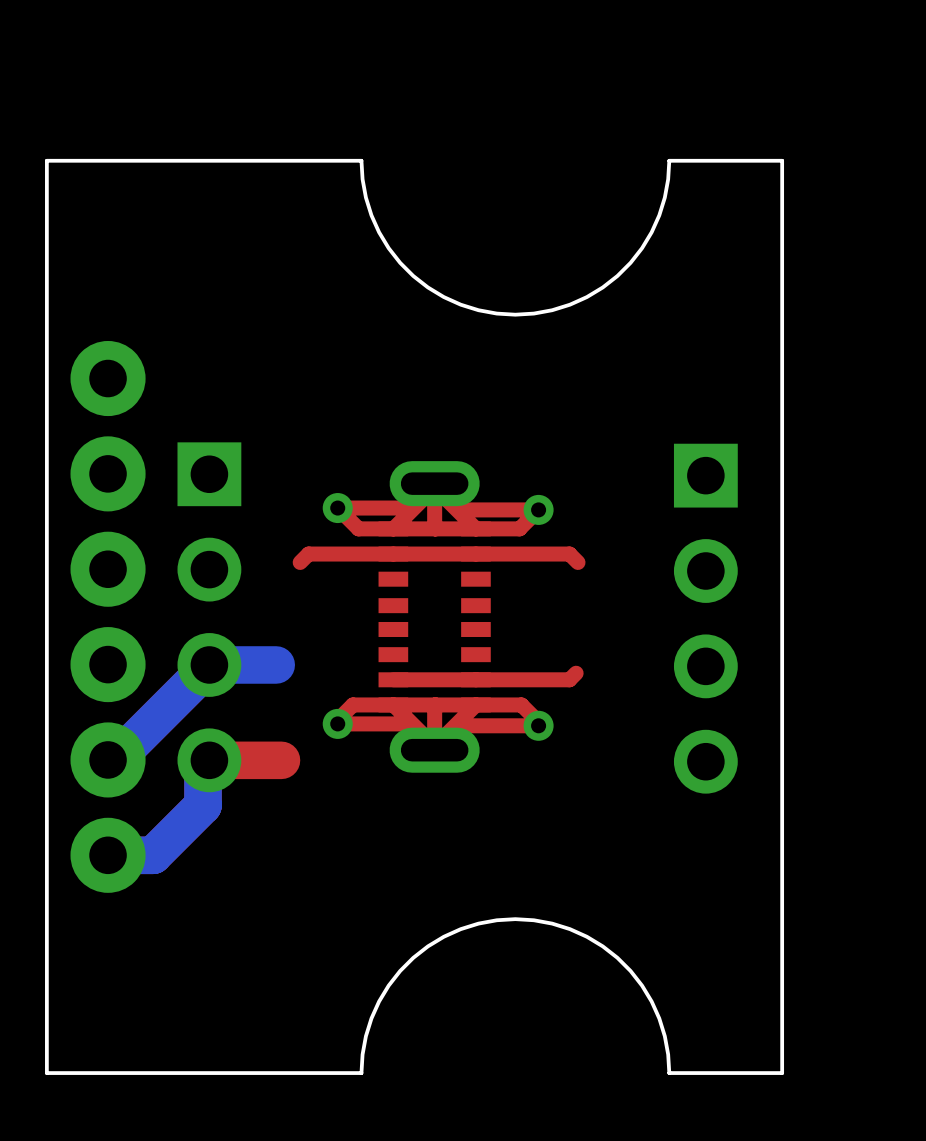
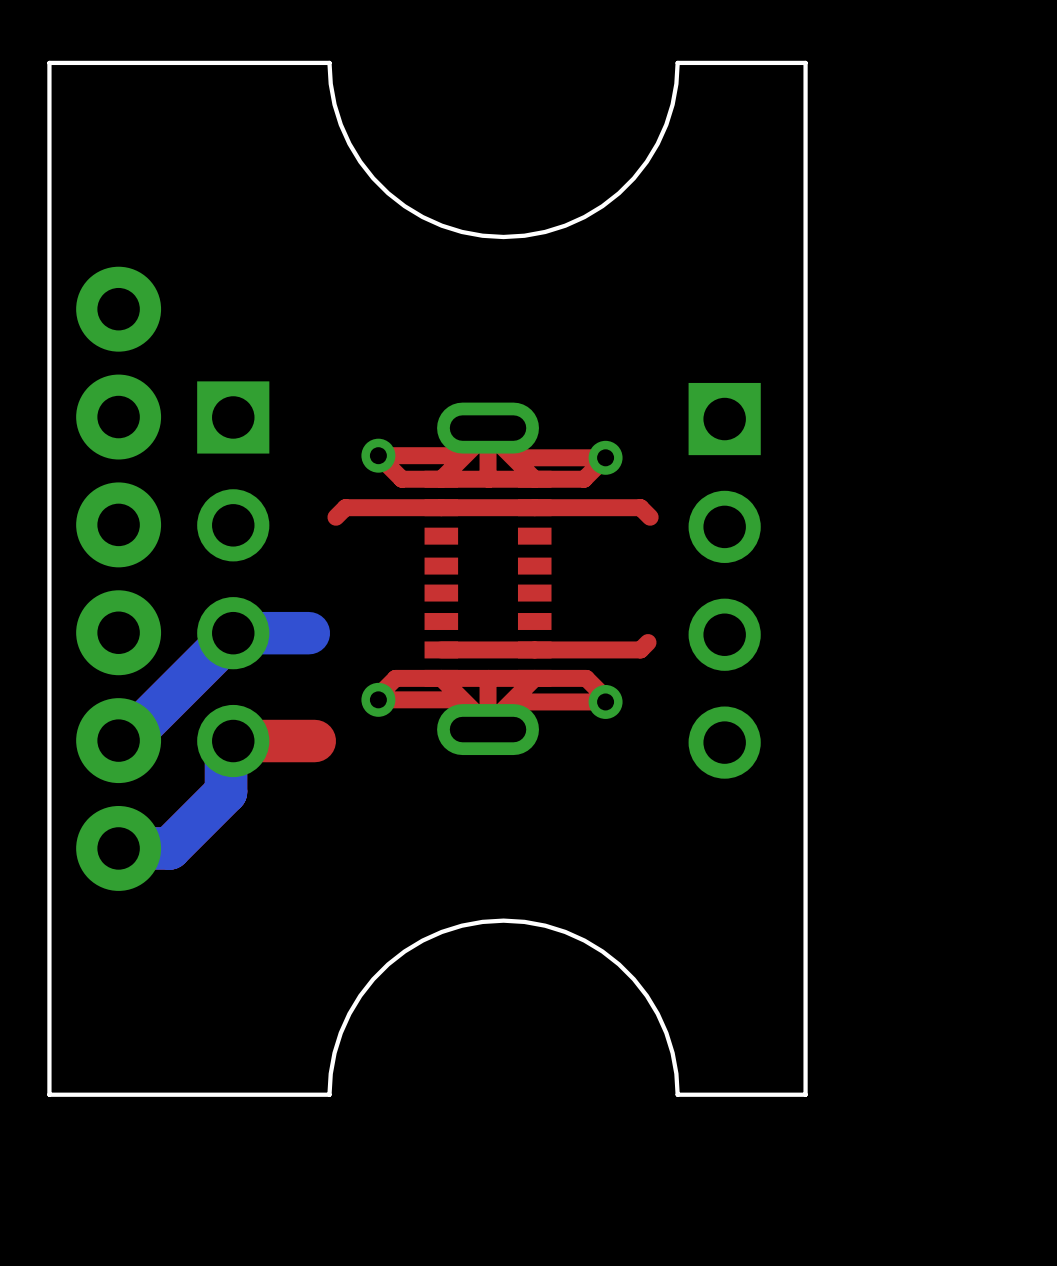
board edge: (669, 160) (668, 179) (659, 215) (642, 248) (630, 262) (617, 275) (586, 297) (552, 310) (515, 314) (496, 313) (460, 304) (443, 297) (413, 275) (388, 248) (371, 215) (362, 179) (361, 160) (294, 160) -> (753, 62) (677, 62) (672, 104) (657, 143) (633, 178) (619, 193) (584, 217) (565, 225) (545, 231) (503, 237) (461, 231) (422, 217) (388, 193) (373, 178) (349, 143) (340, 124) (330, 83) (329, 62)
board edge: (715, 160) (782, 160) (782, 1073) (715, 1073) -> (805, 62) (805, 1094)
part position: (705, 618) -> (724, 580)
board edge: (669, 1073) (664, 1036) (651, 1001) (642, 985) (617, 957) (586, 936) (569, 929) (533, 920) (515, 919) (496, 920) (460, 929) (443, 936) (413, 957) (388, 985) (379, 1001) (365, 1036) (361, 1073) (294, 1073) -> (753, 1094) (677, 1094) (672, 1053) (657, 1013) (646, 995) (619, 964) (602, 951) (565, 931) (545, 925) (503, 920) (482, 921) (441, 931) (404, 951) (388, 964) (360, 995) (340, 1033) (330, 1073) (329, 1094)

